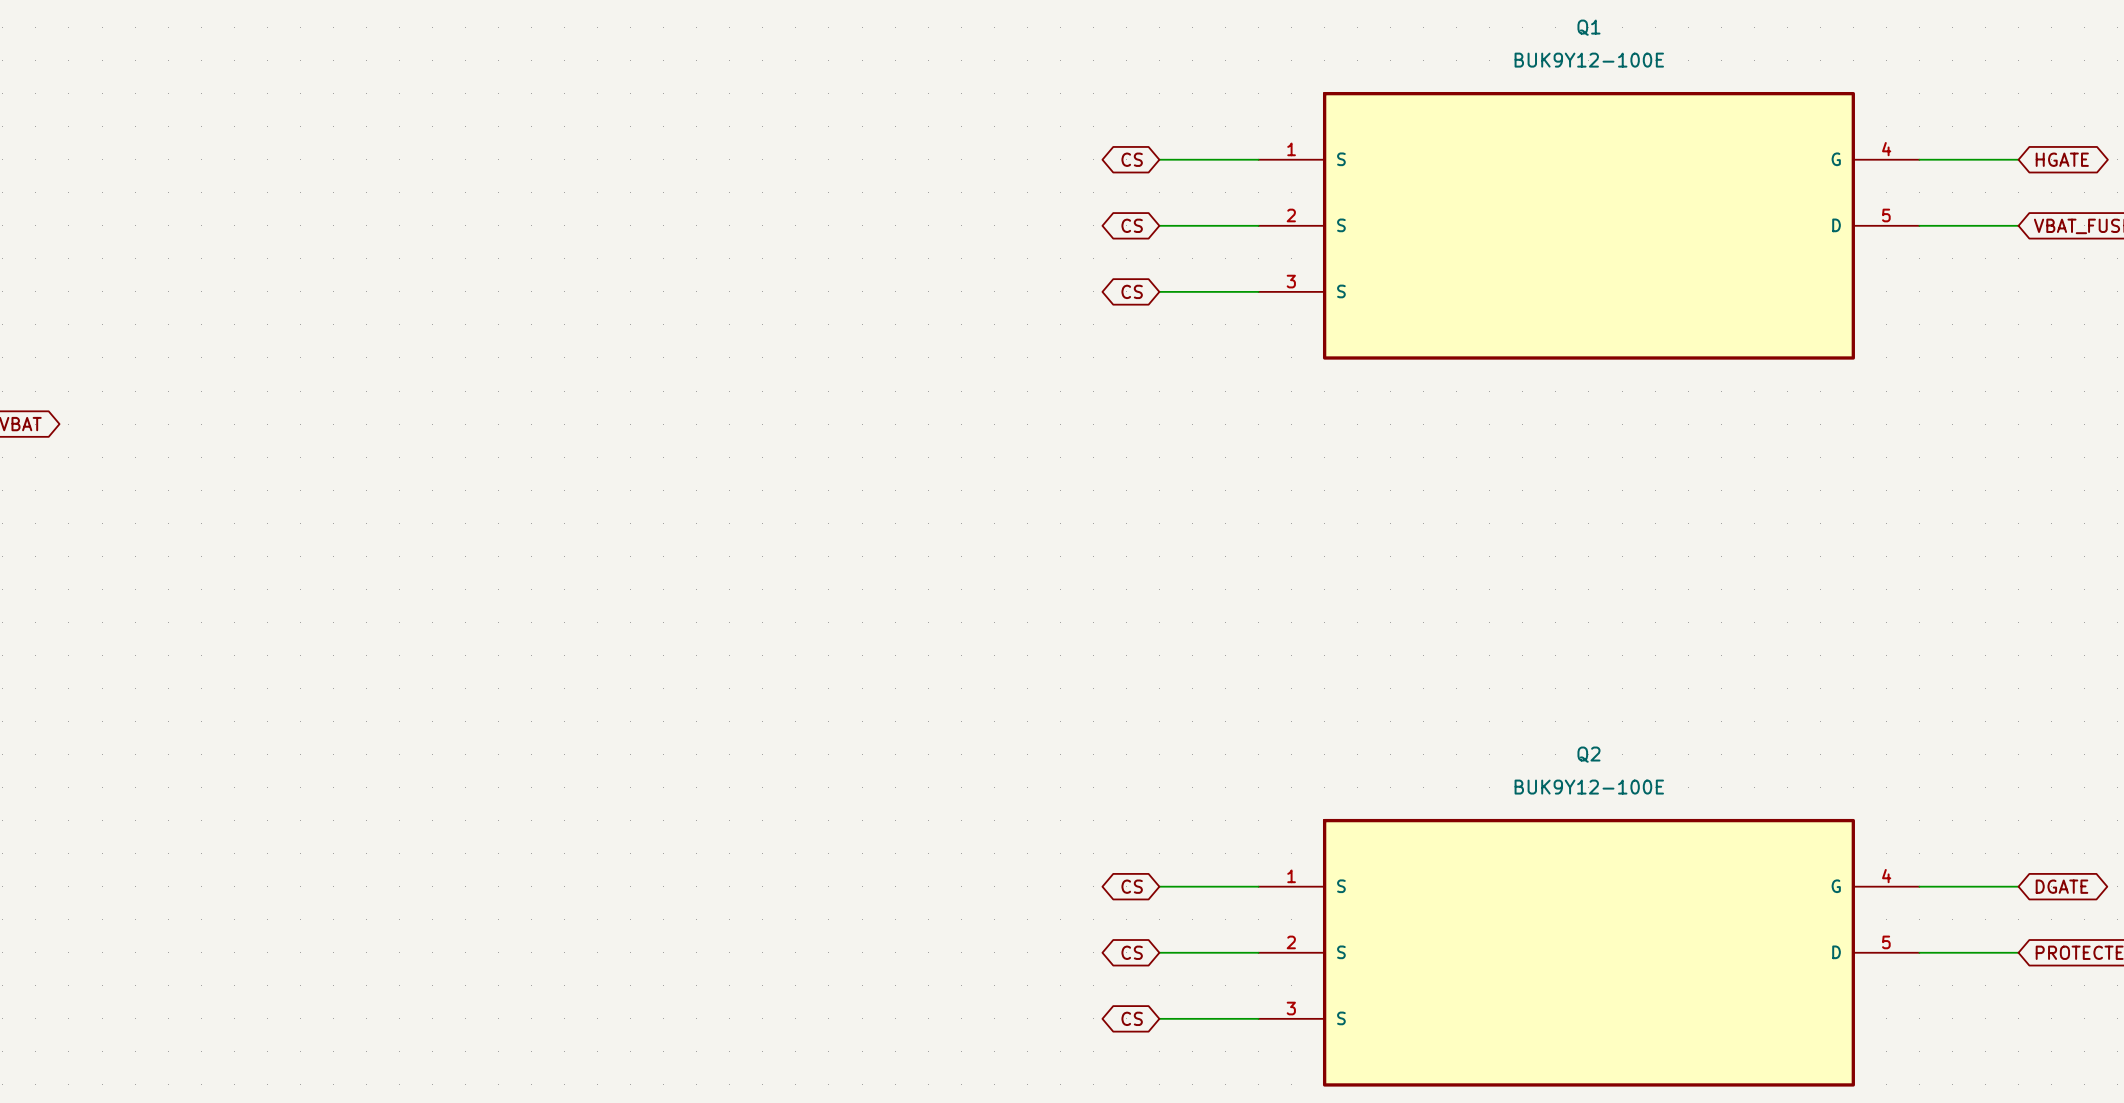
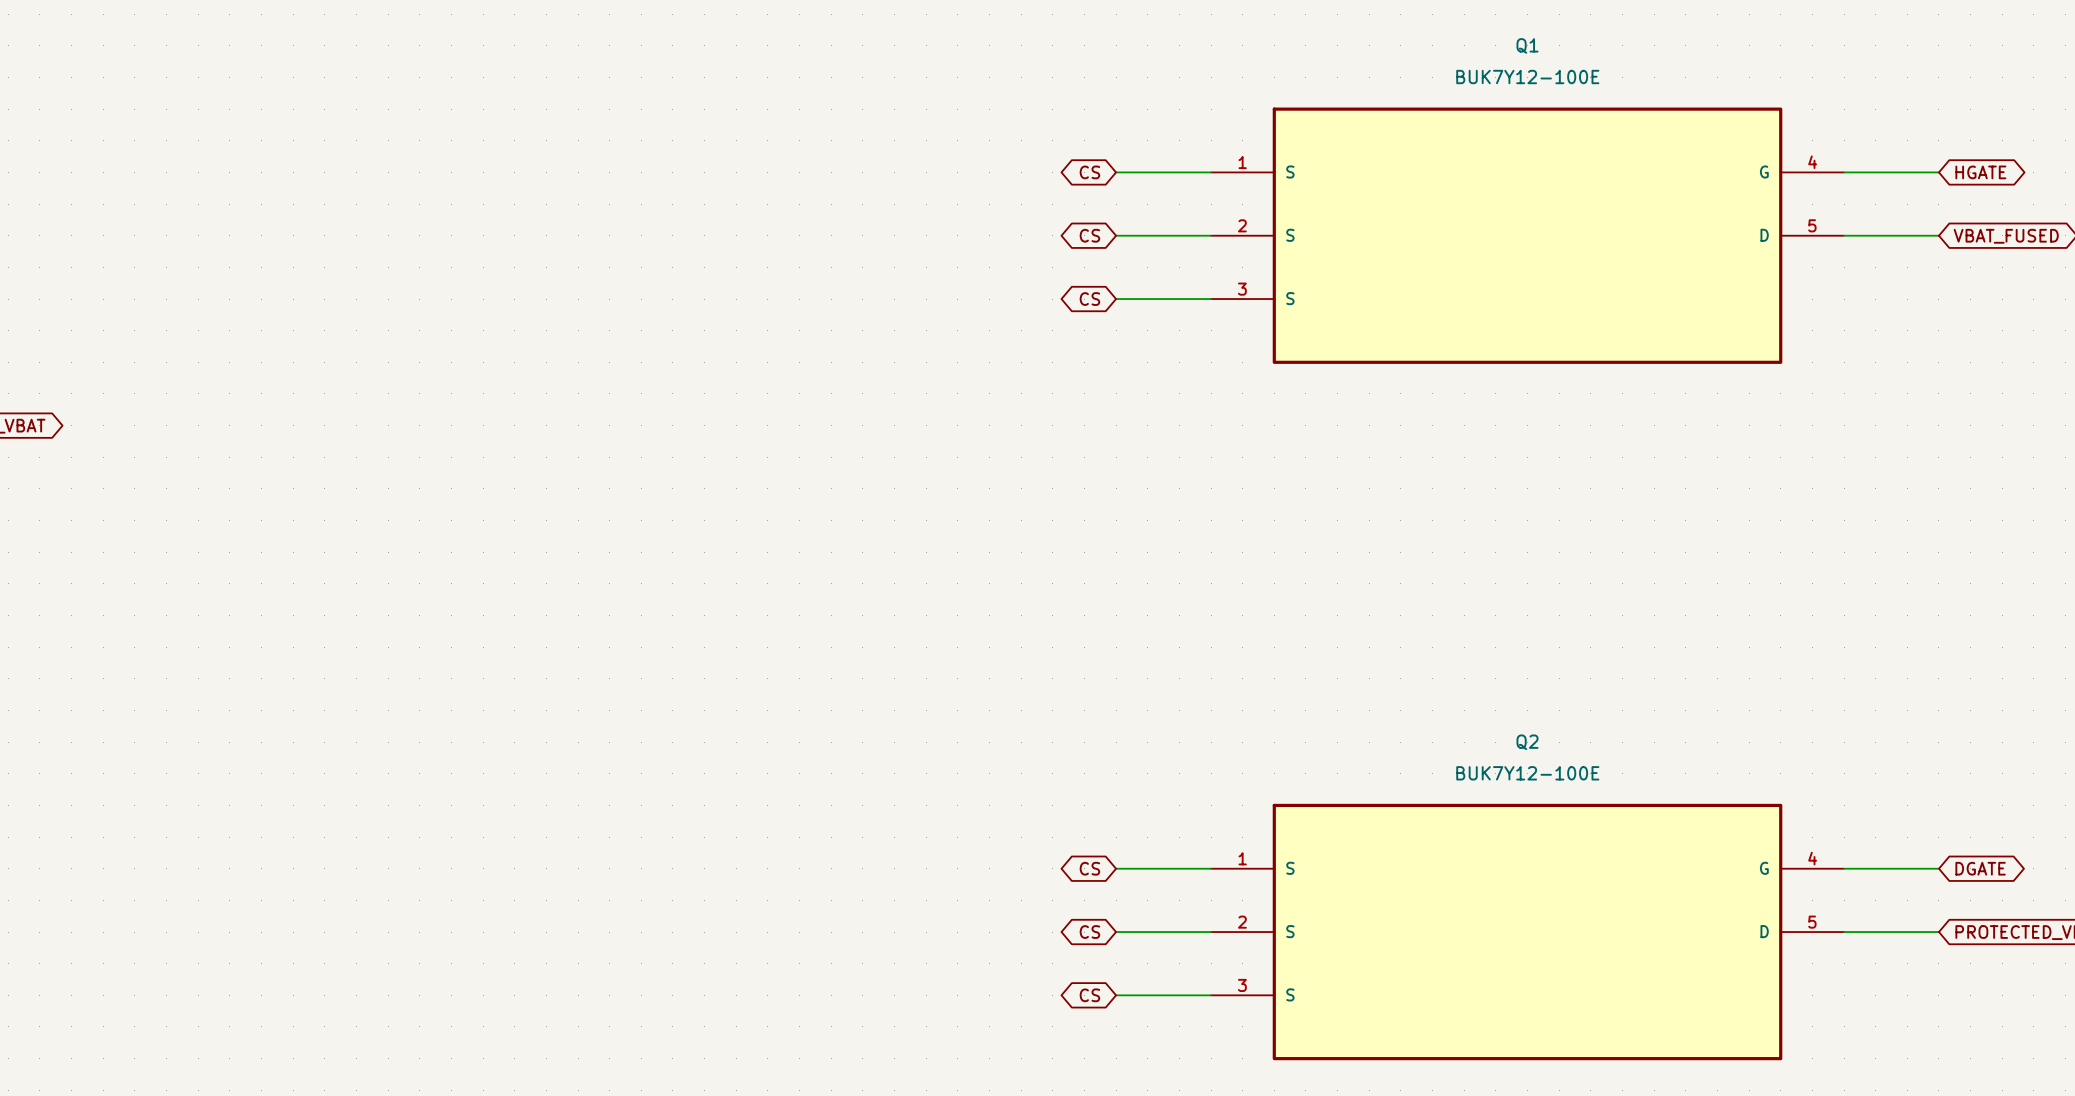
Q1 value: BUK9Y12-100E (1589, 60) -> BUK7Y12-100E (1527, 77)
Q2 value: BUK9Y12-100E (1589, 787) -> BUK7Y12-100E (1527, 773)

